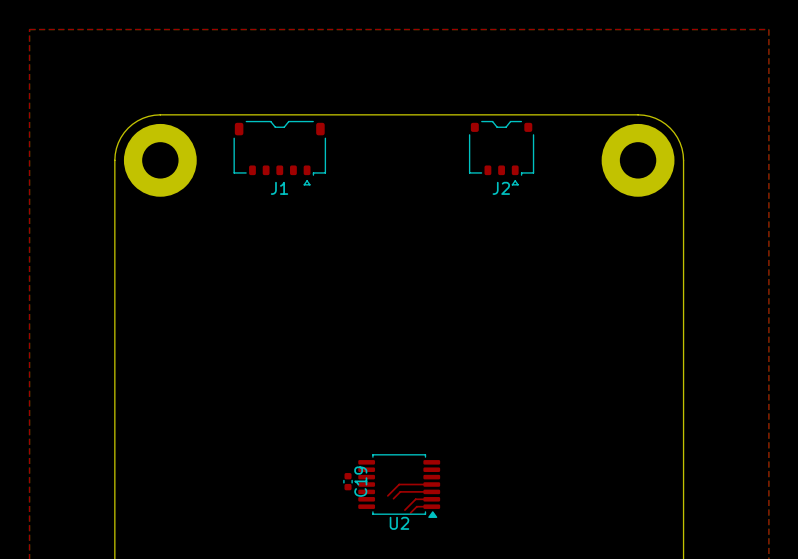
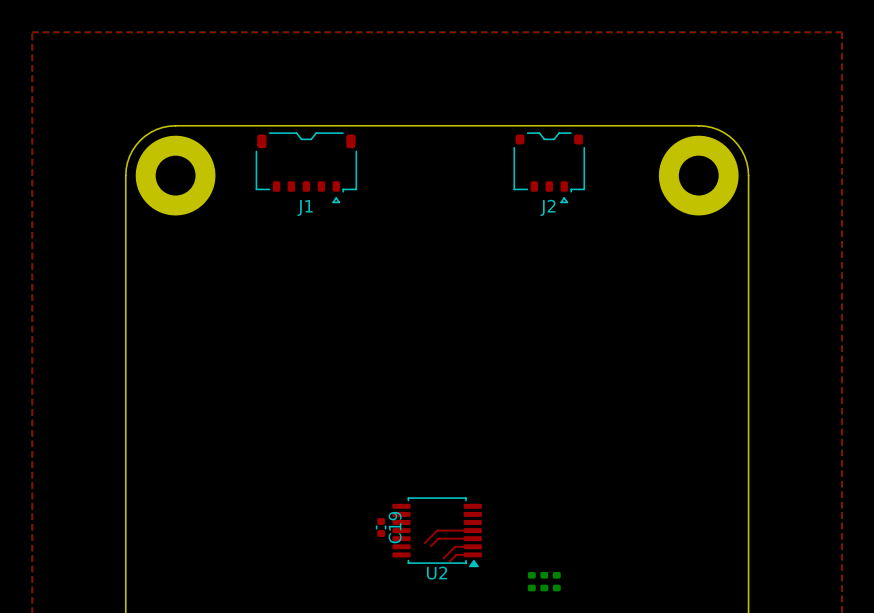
part: none -> (531, 581)
part: none -> (544, 581)
part: none -> (556, 581)

